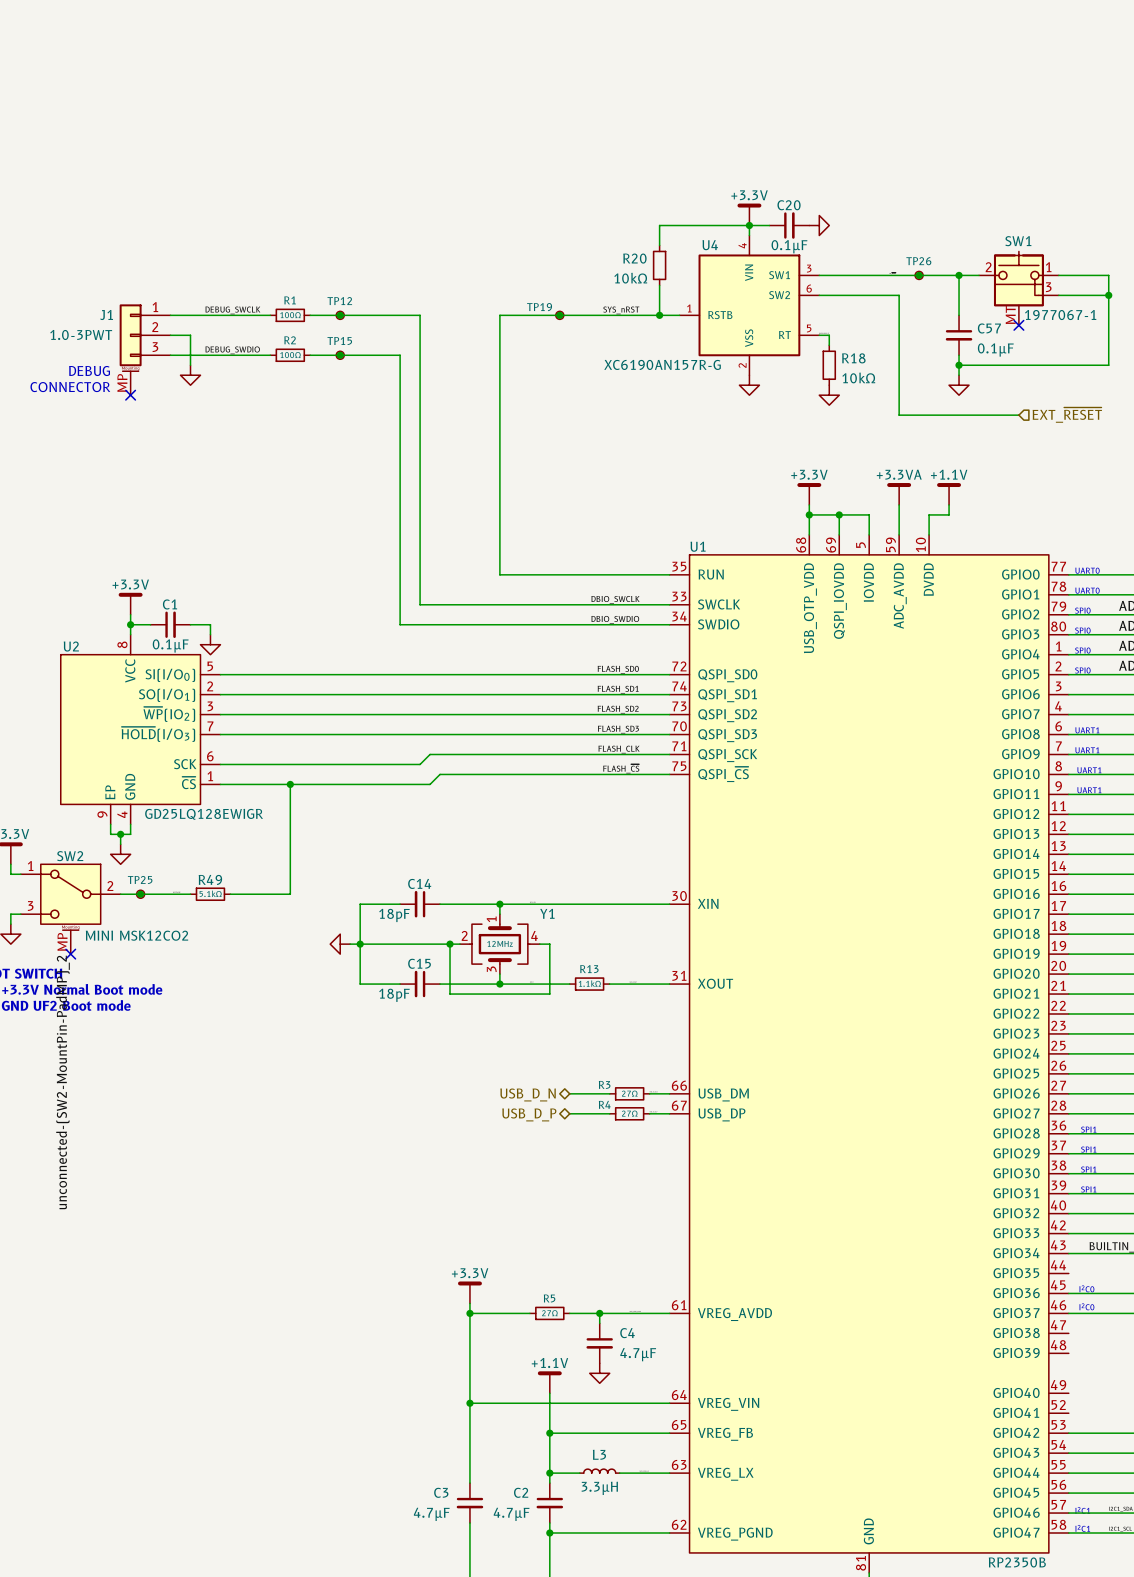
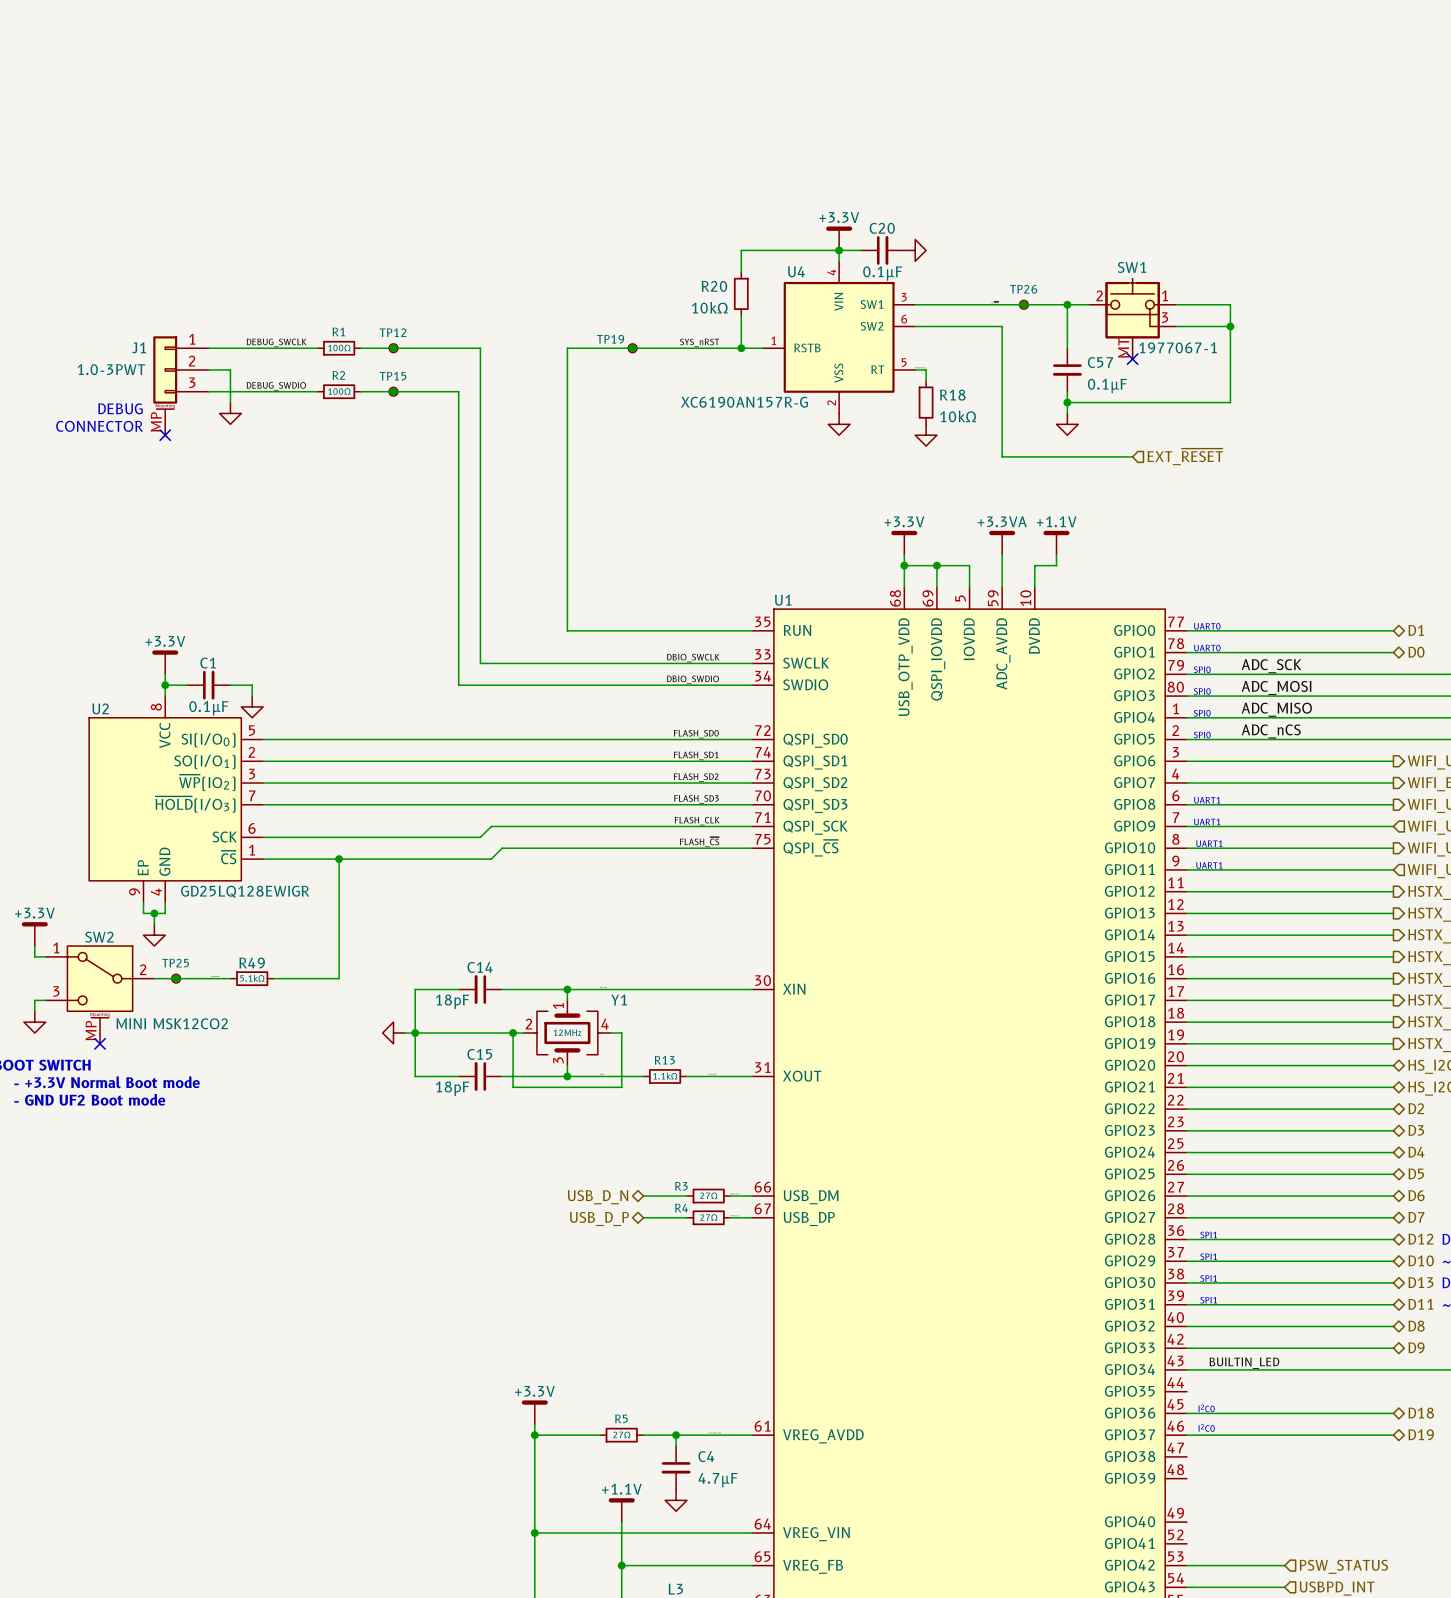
label: unconnected-(SW2-MountPin-PadMP)_2 (62, 1082) -> none

